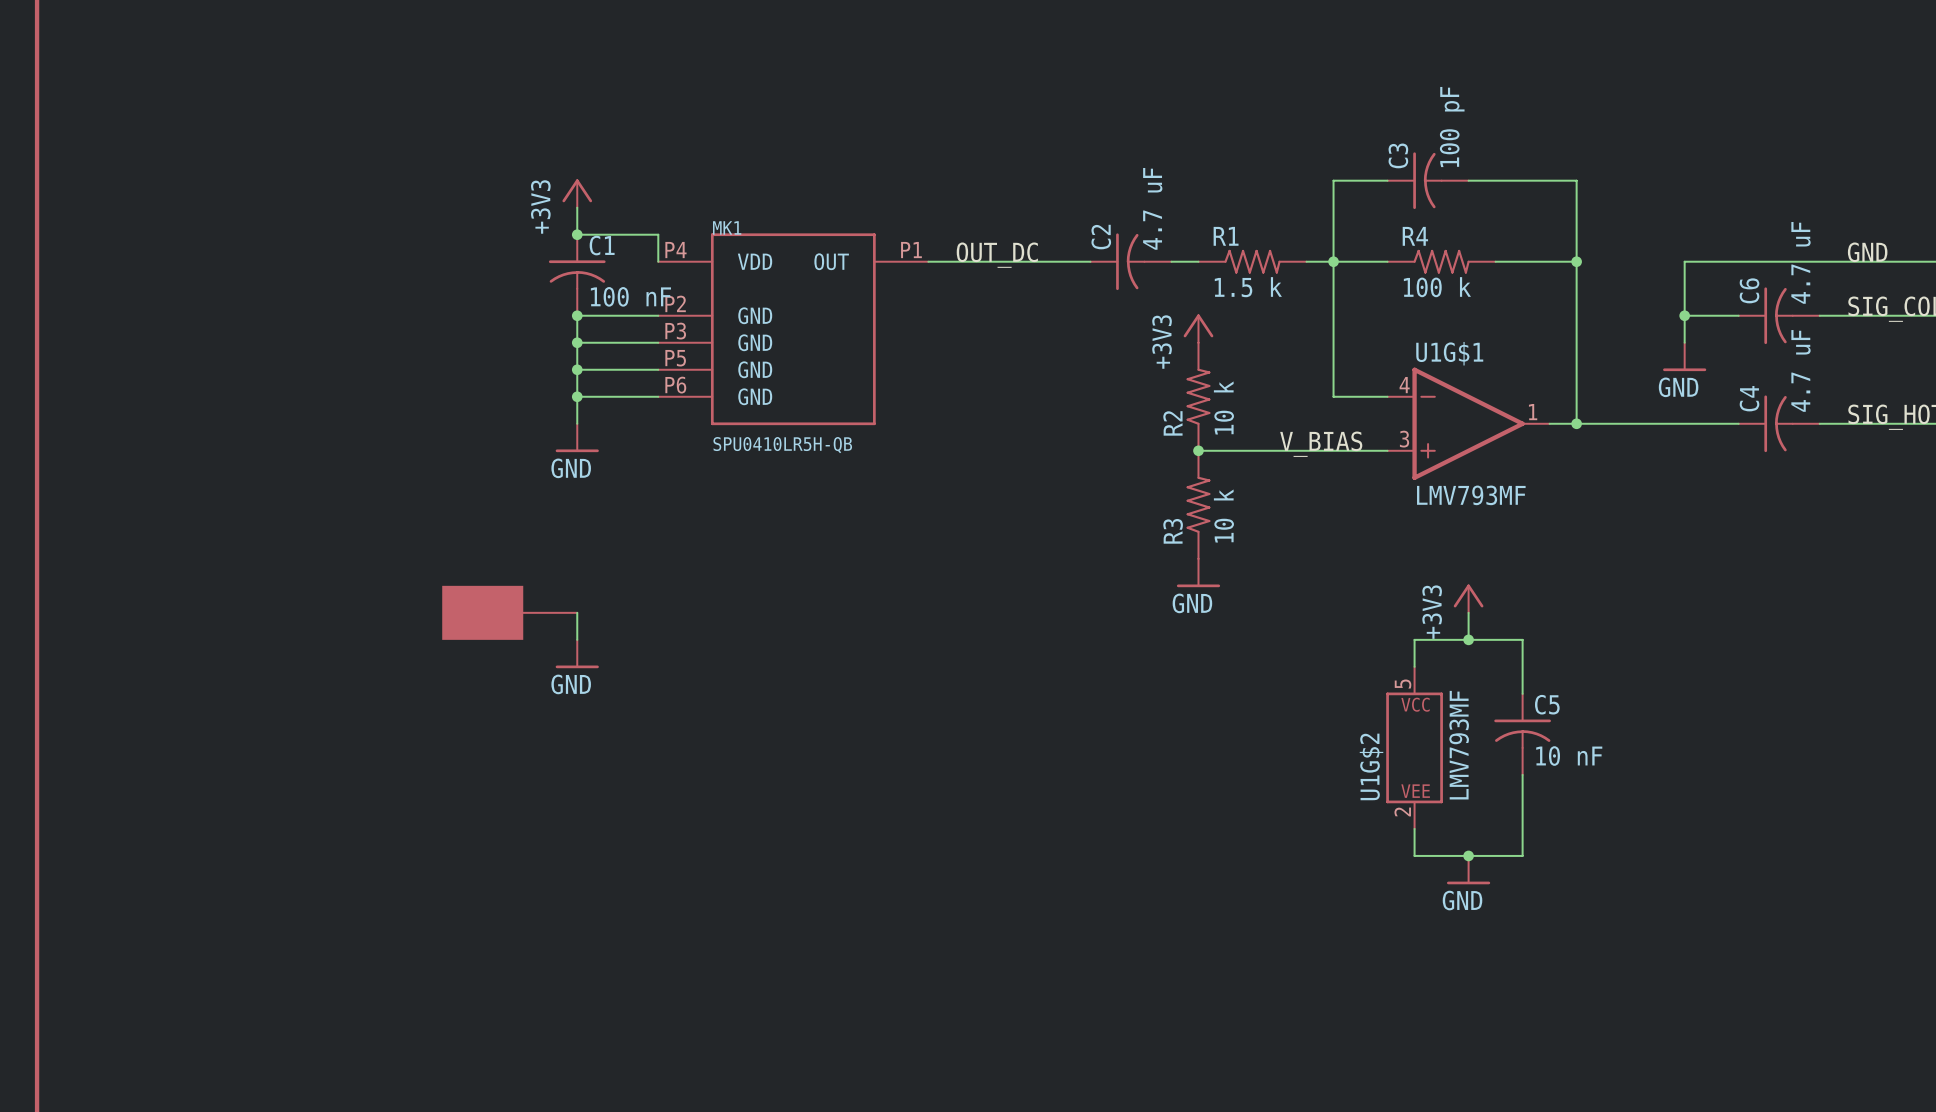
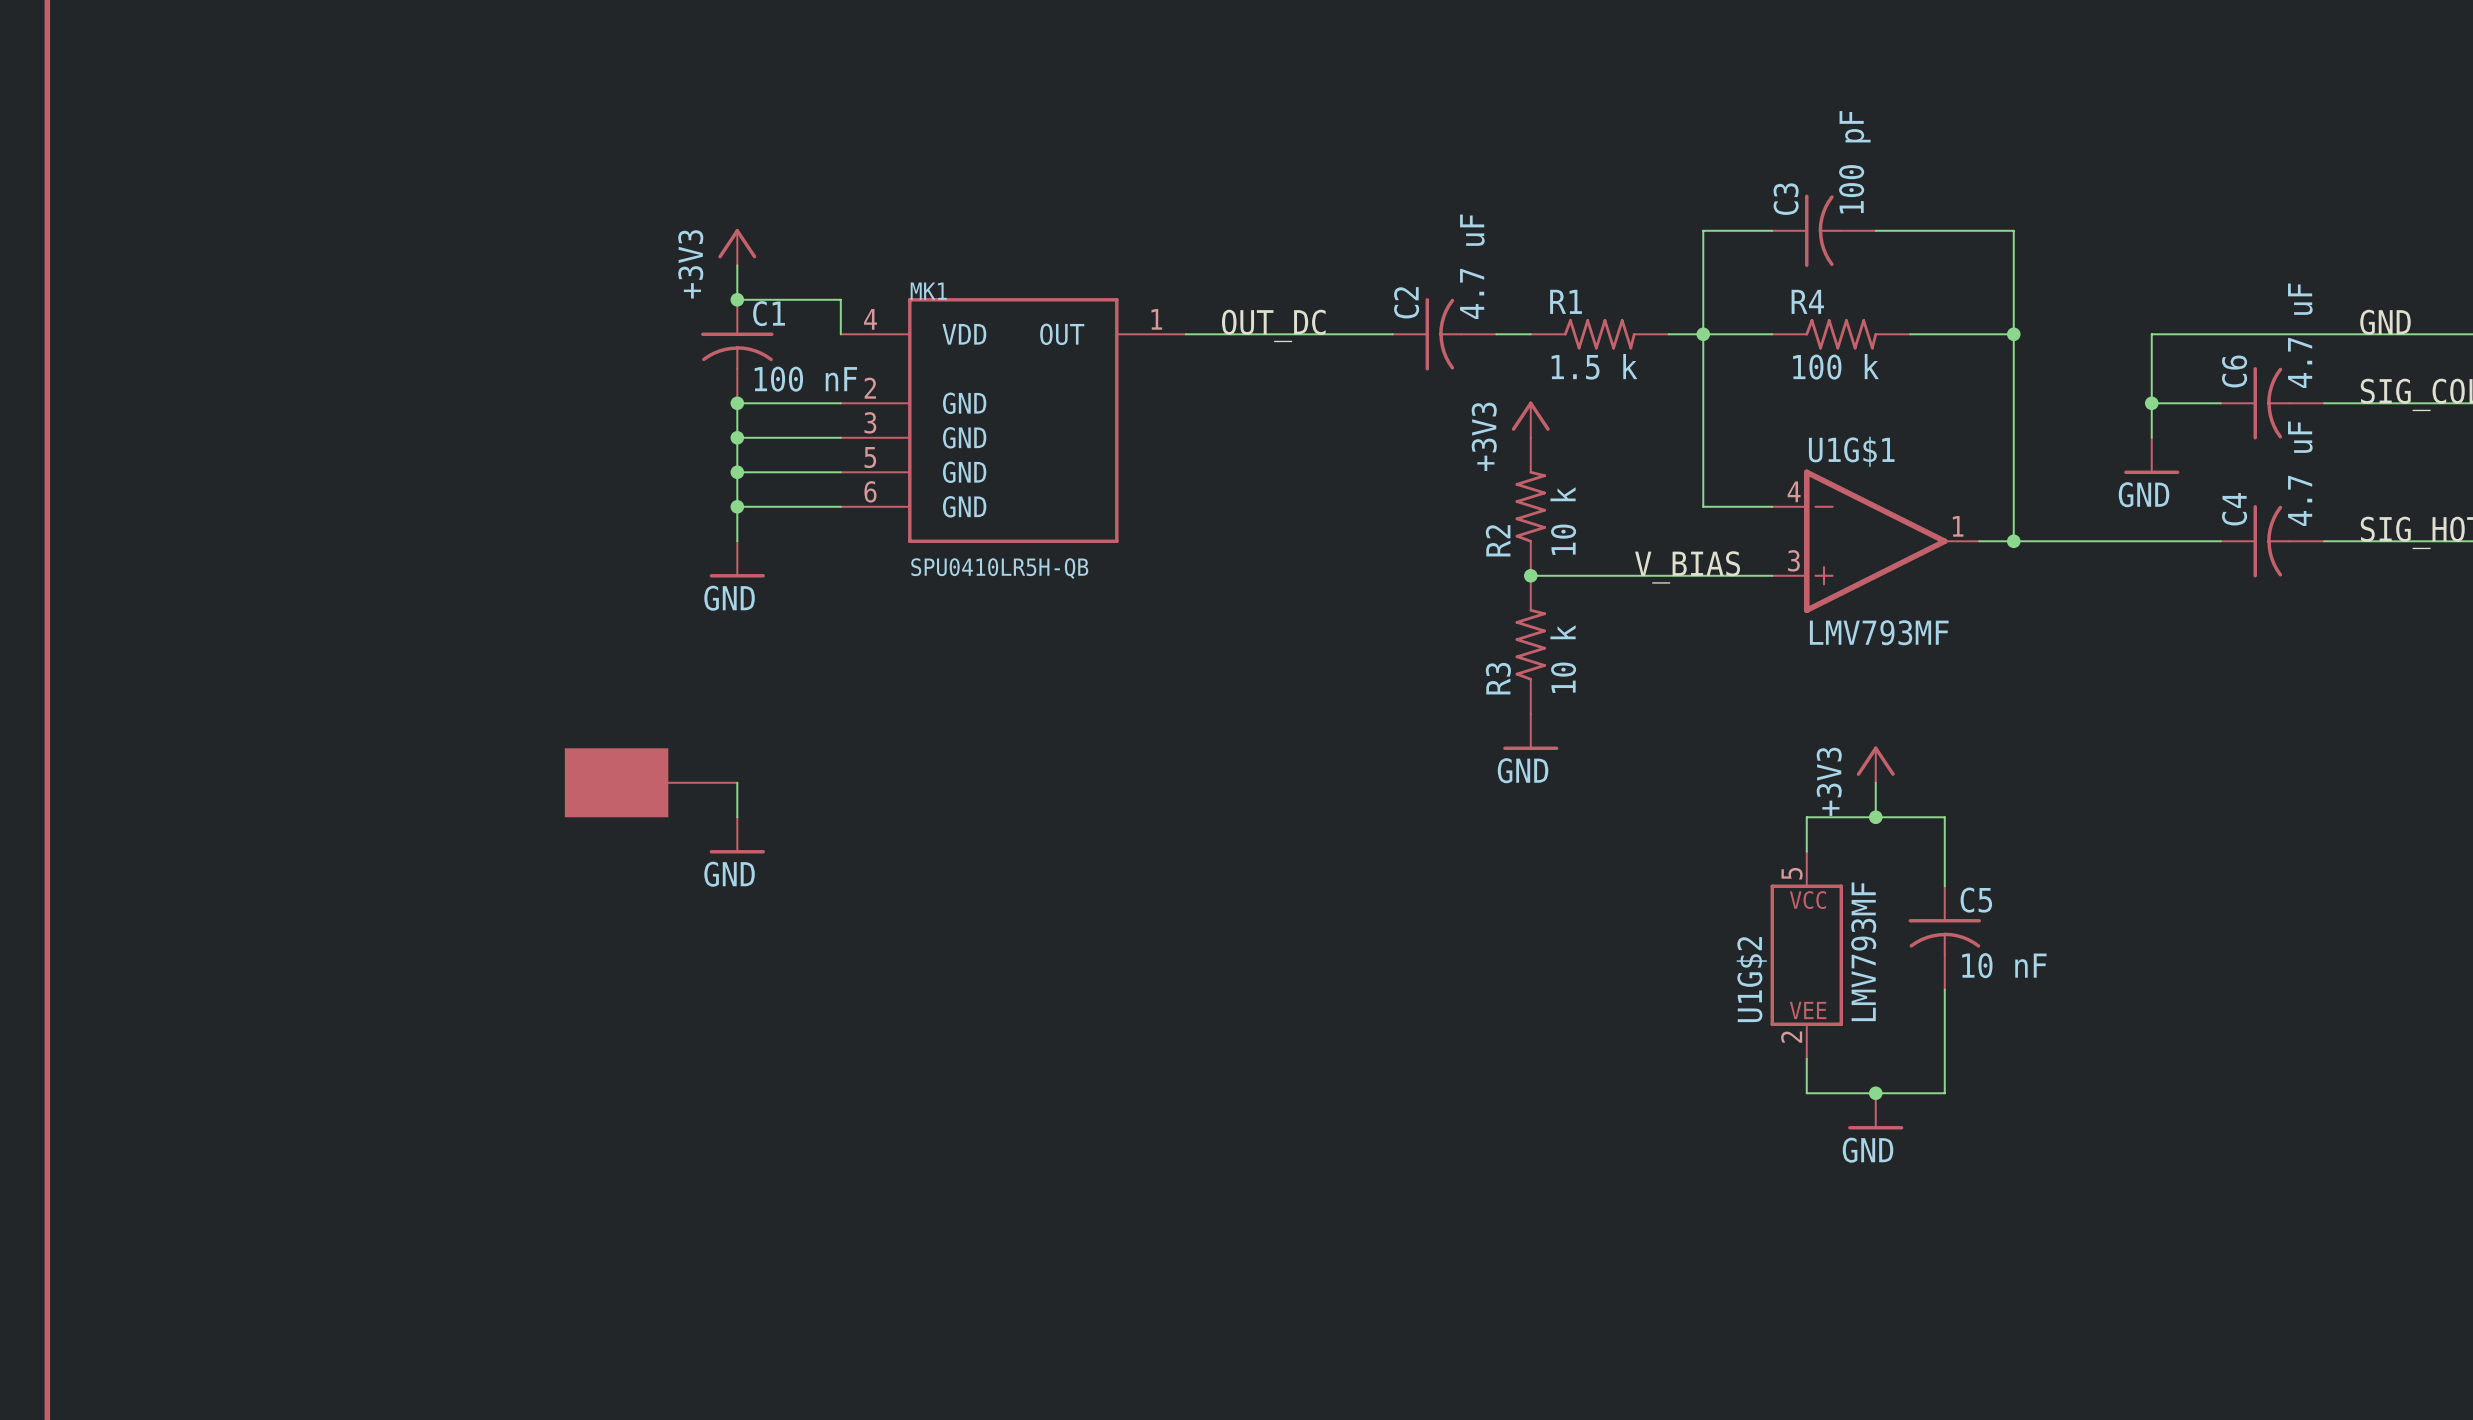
MK1 pin number: P4 (675, 250) -> 4 (870, 319)
MK1 pin number: P1 (911, 250) -> 1 (1156, 319)
MK1 pin number: P2 (675, 303) -> 2 (870, 388)
MK1 pin number: P3 (675, 331) -> 3 (870, 422)
MK1 pin number: P5 (675, 358) -> 5 (870, 457)
MK1 pin number: P6 (675, 385) -> 6 (870, 491)

